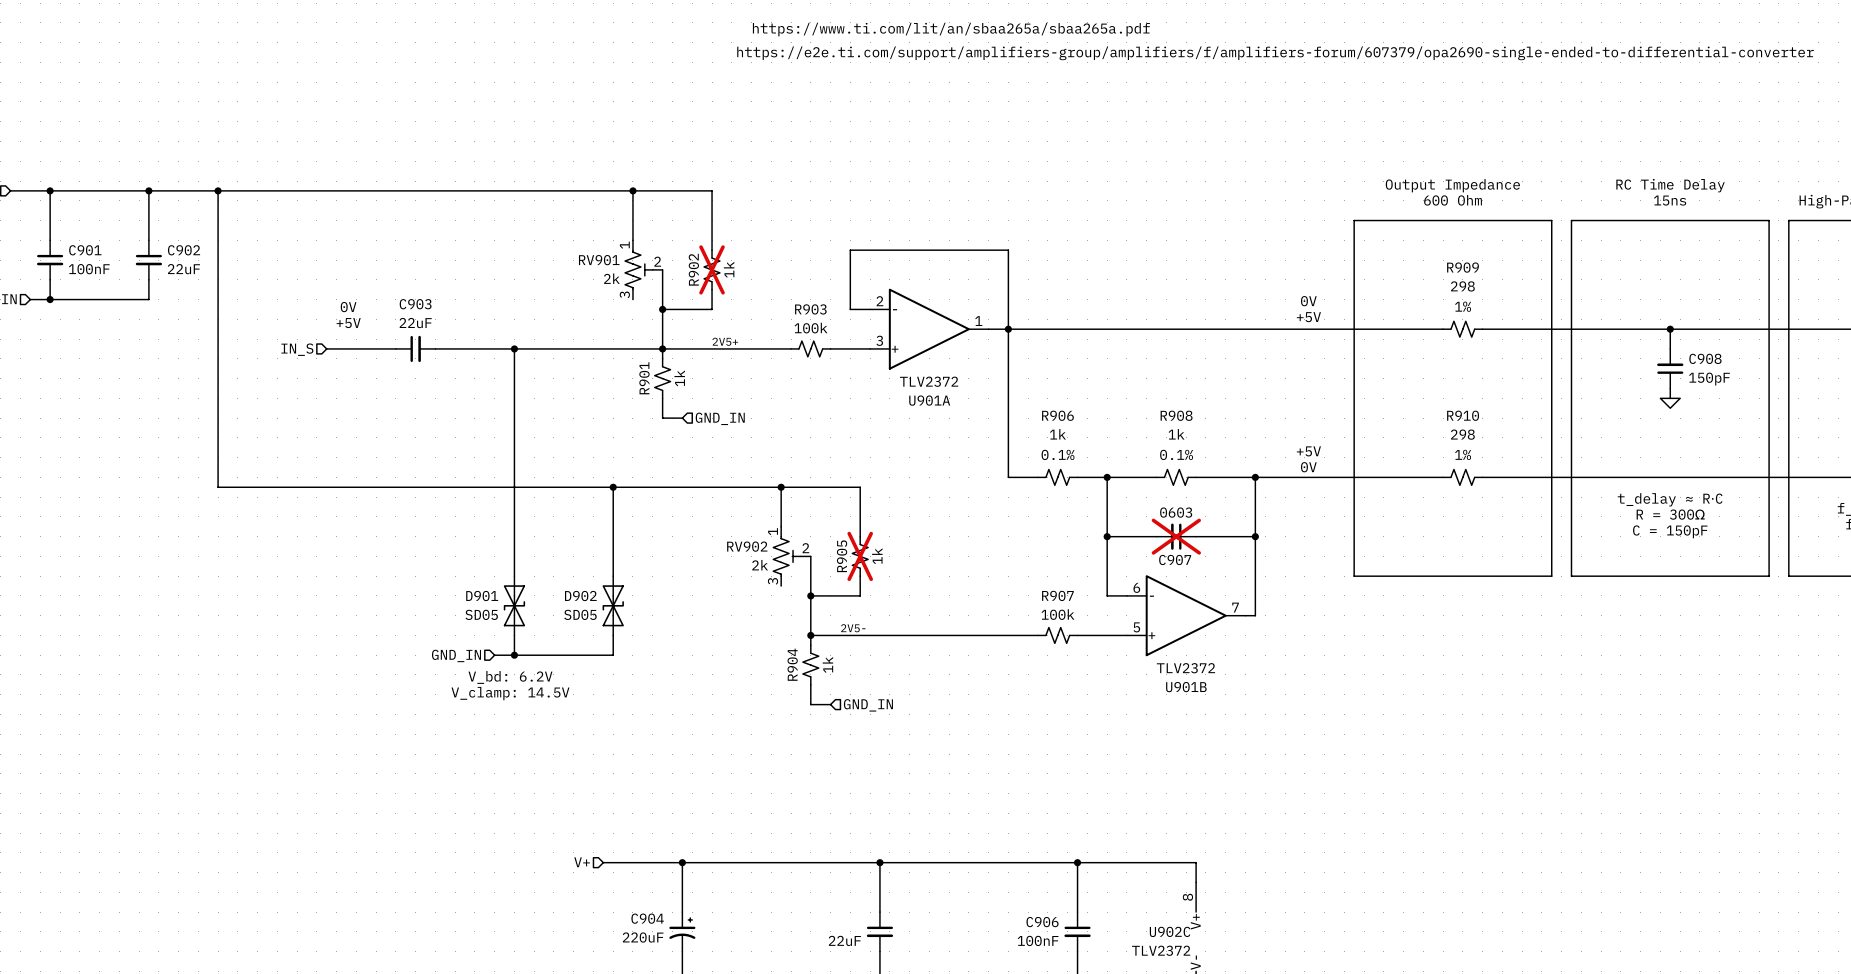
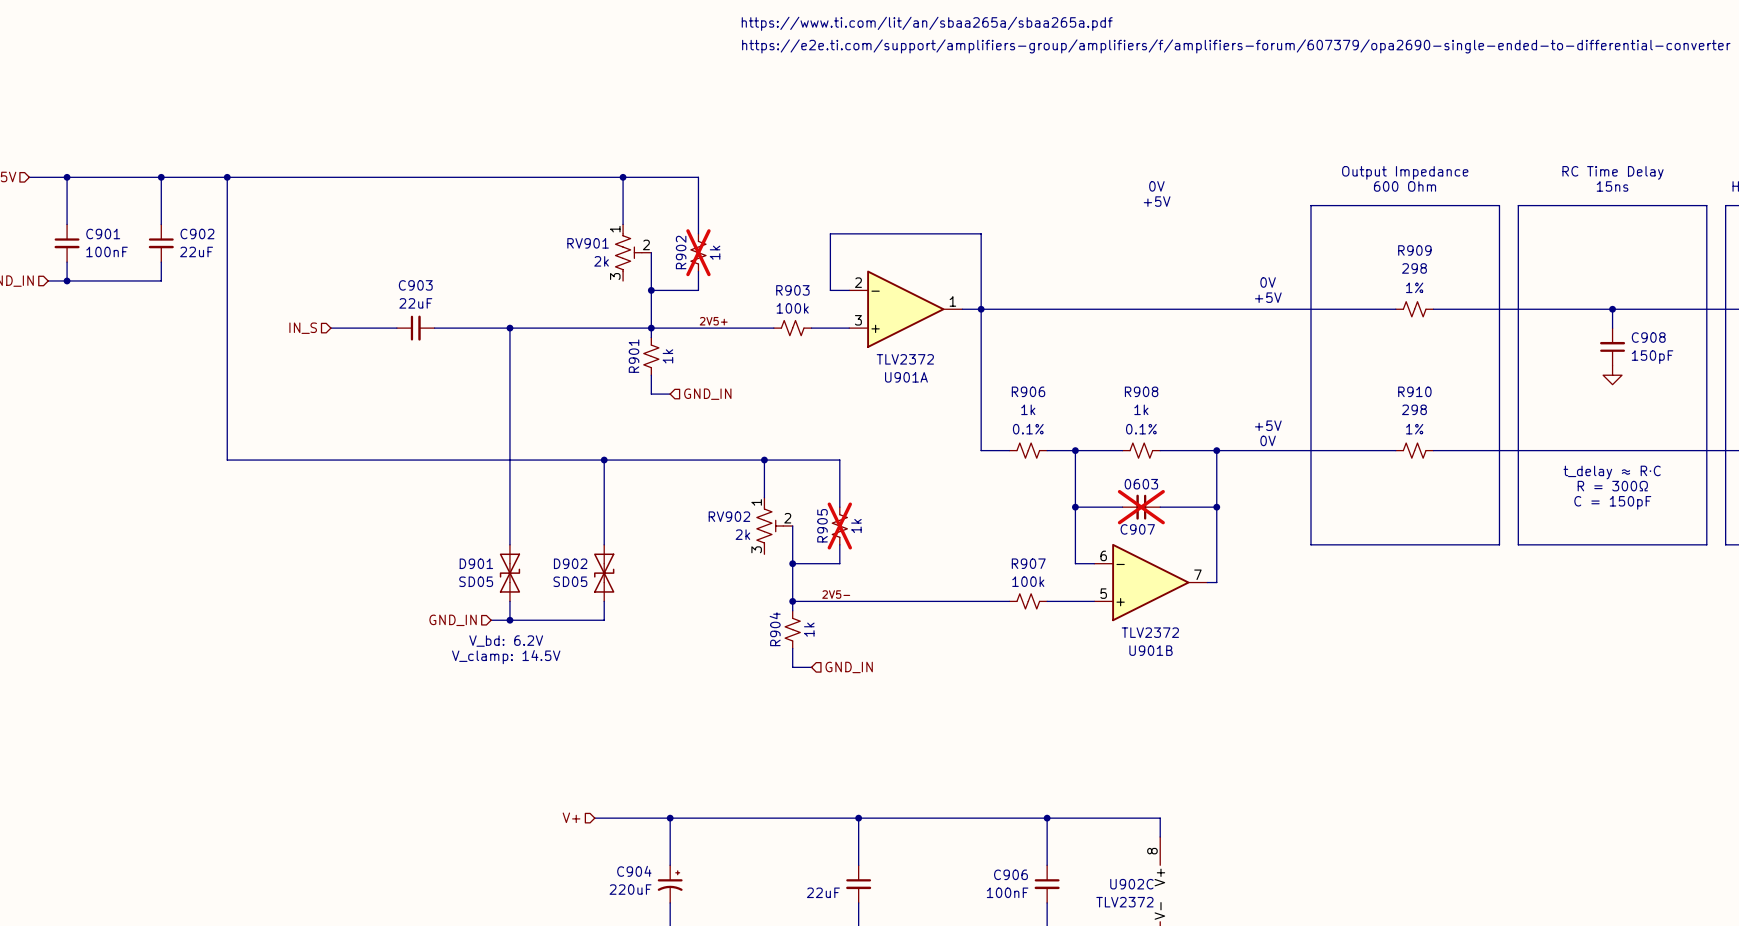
text: none -> 0V (1156, 186)
text: none -> +5V (1157, 201)
text: 0V (348, 307) -> none
text: +5V (348, 323) -> none

